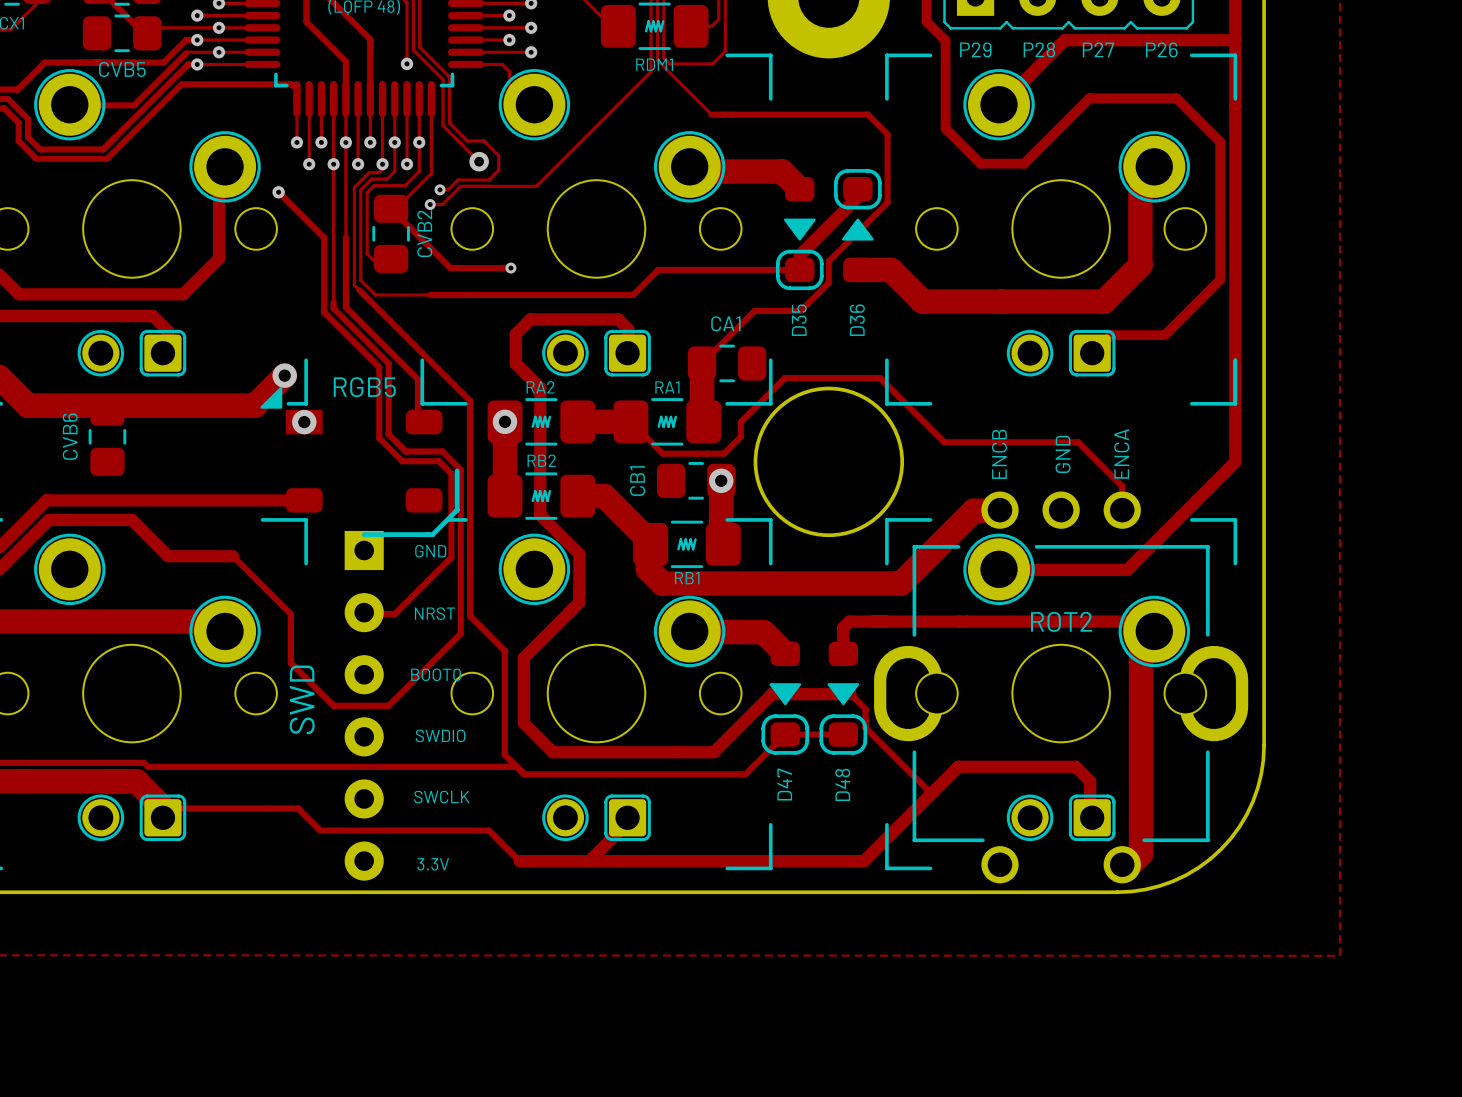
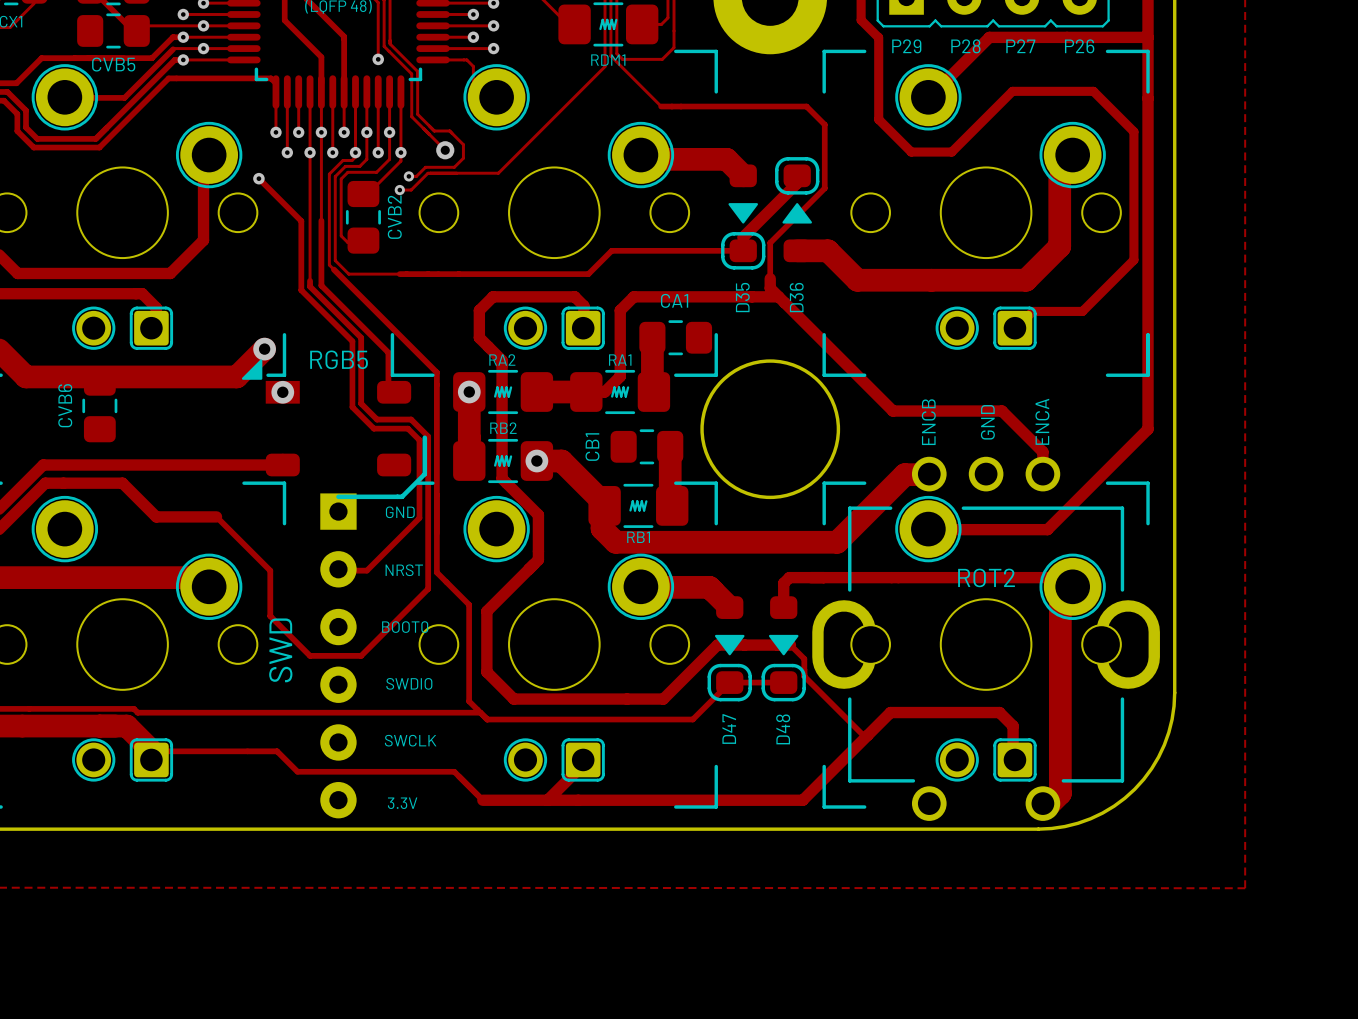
via: none -> (400, 152)
track: (391, 208) (450, 268) (510, 268) -> none
via: (510, 268) -> none
track: (828, 282) (800, 310) (754, 310) (702, 363) -> (770, 262) (770, 288) (892, 411)
track: (630, 421) (662, 453) (723, 453) (740, 436) (740, 422) (784, 378) (880, 378) (944, 442) (960, 442) -> (586, 392) (604, 392) (620, 376) (620, 310) (633, 296) (778, 296) (784, 302)
track width: thin (960, 442) (1078, 442) (1122, 486) (1122, 515) -> thick (892, 411) (1002, 411) (1042, 451) (1042, 479)
via position: (721, 480) -> (536, 461)

